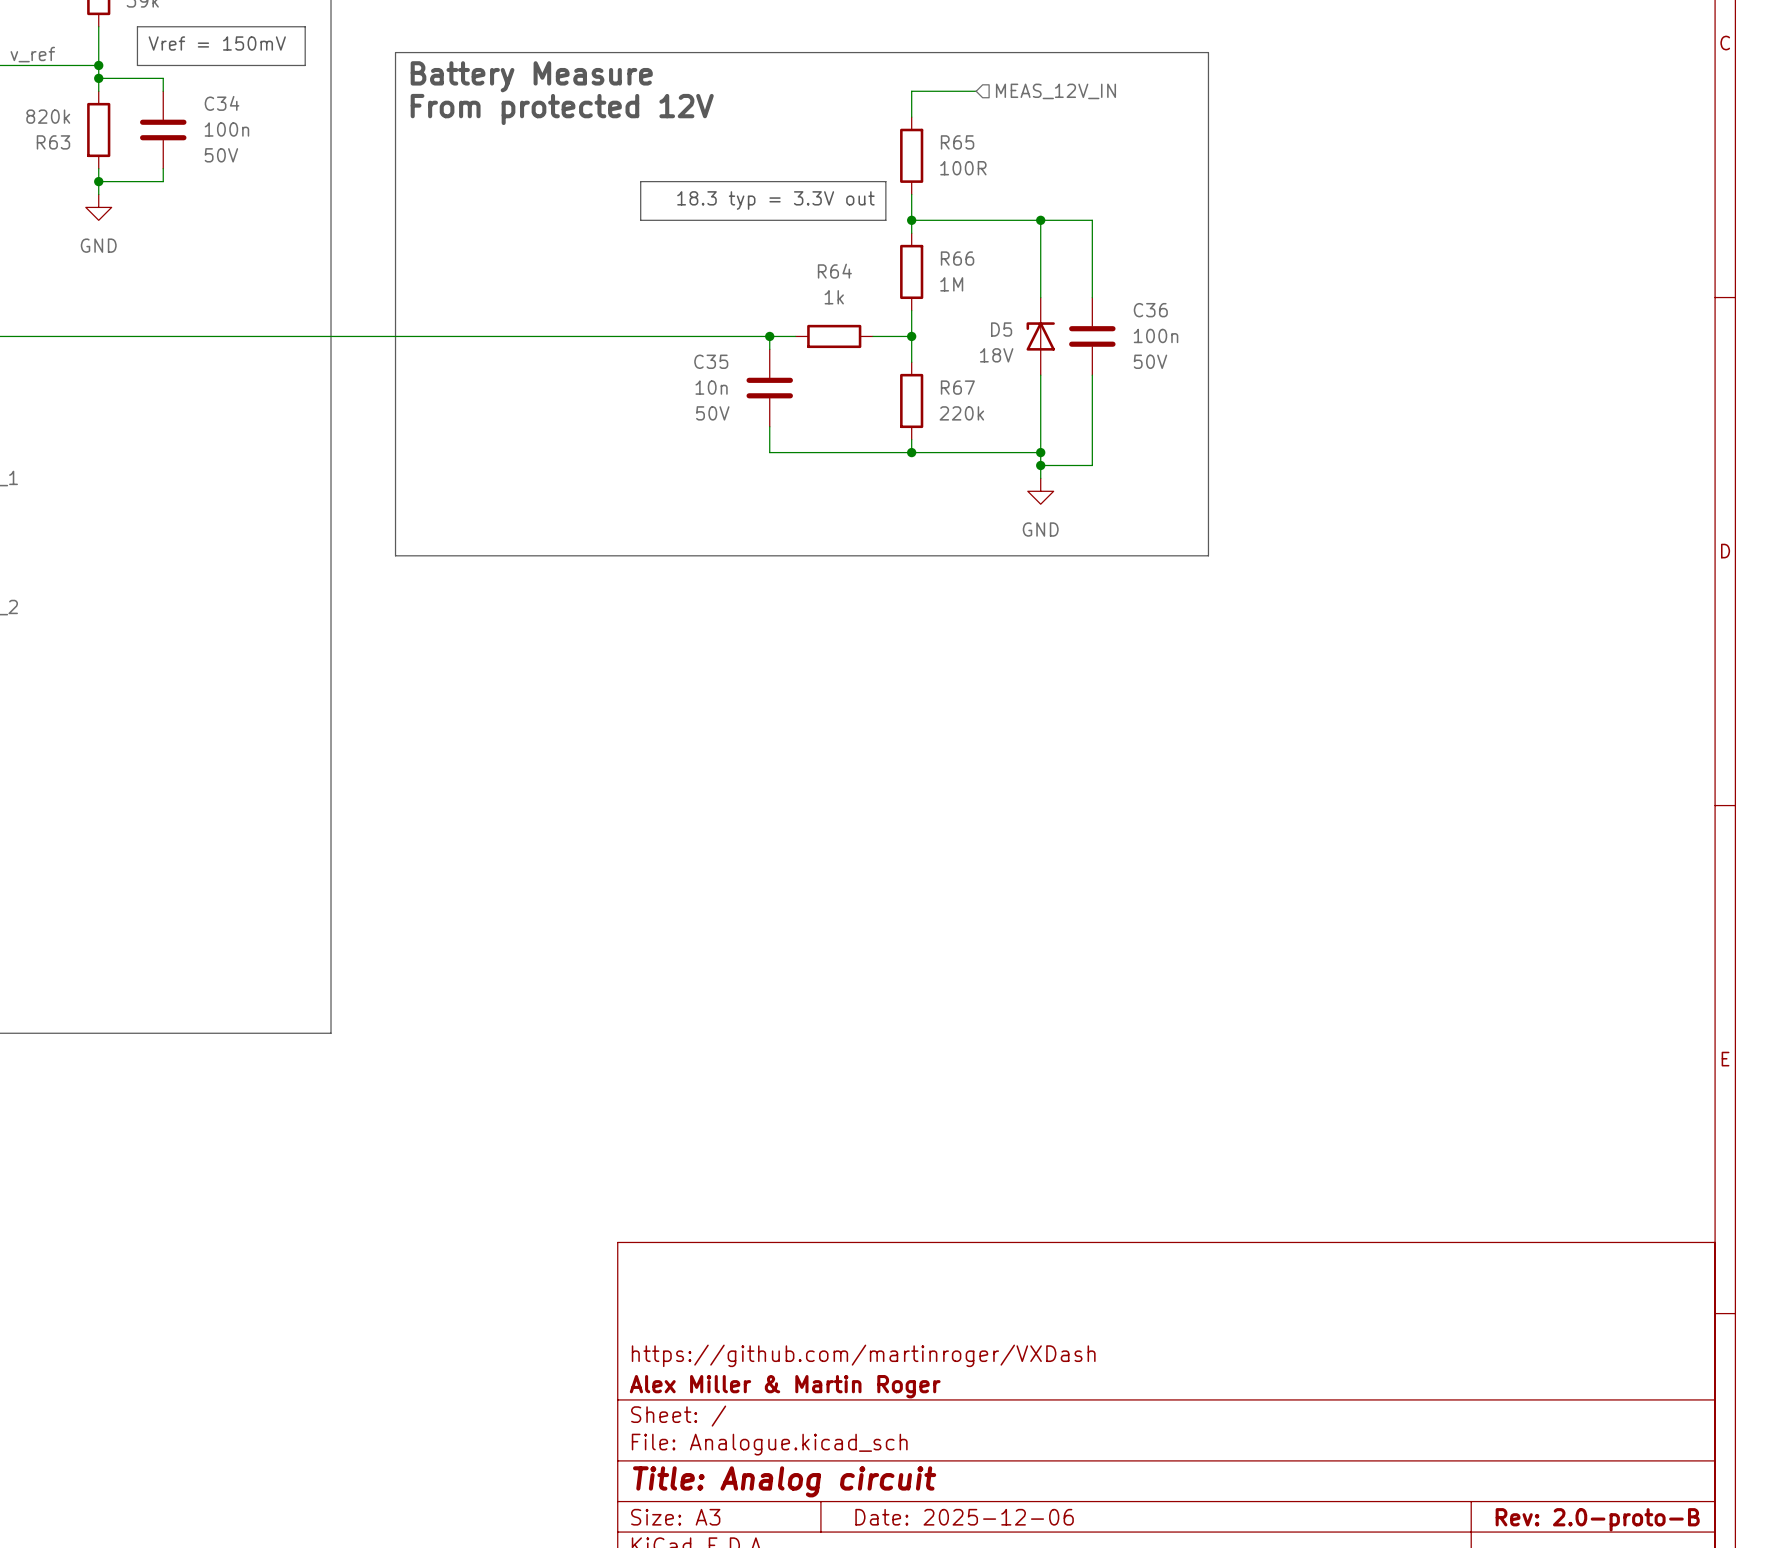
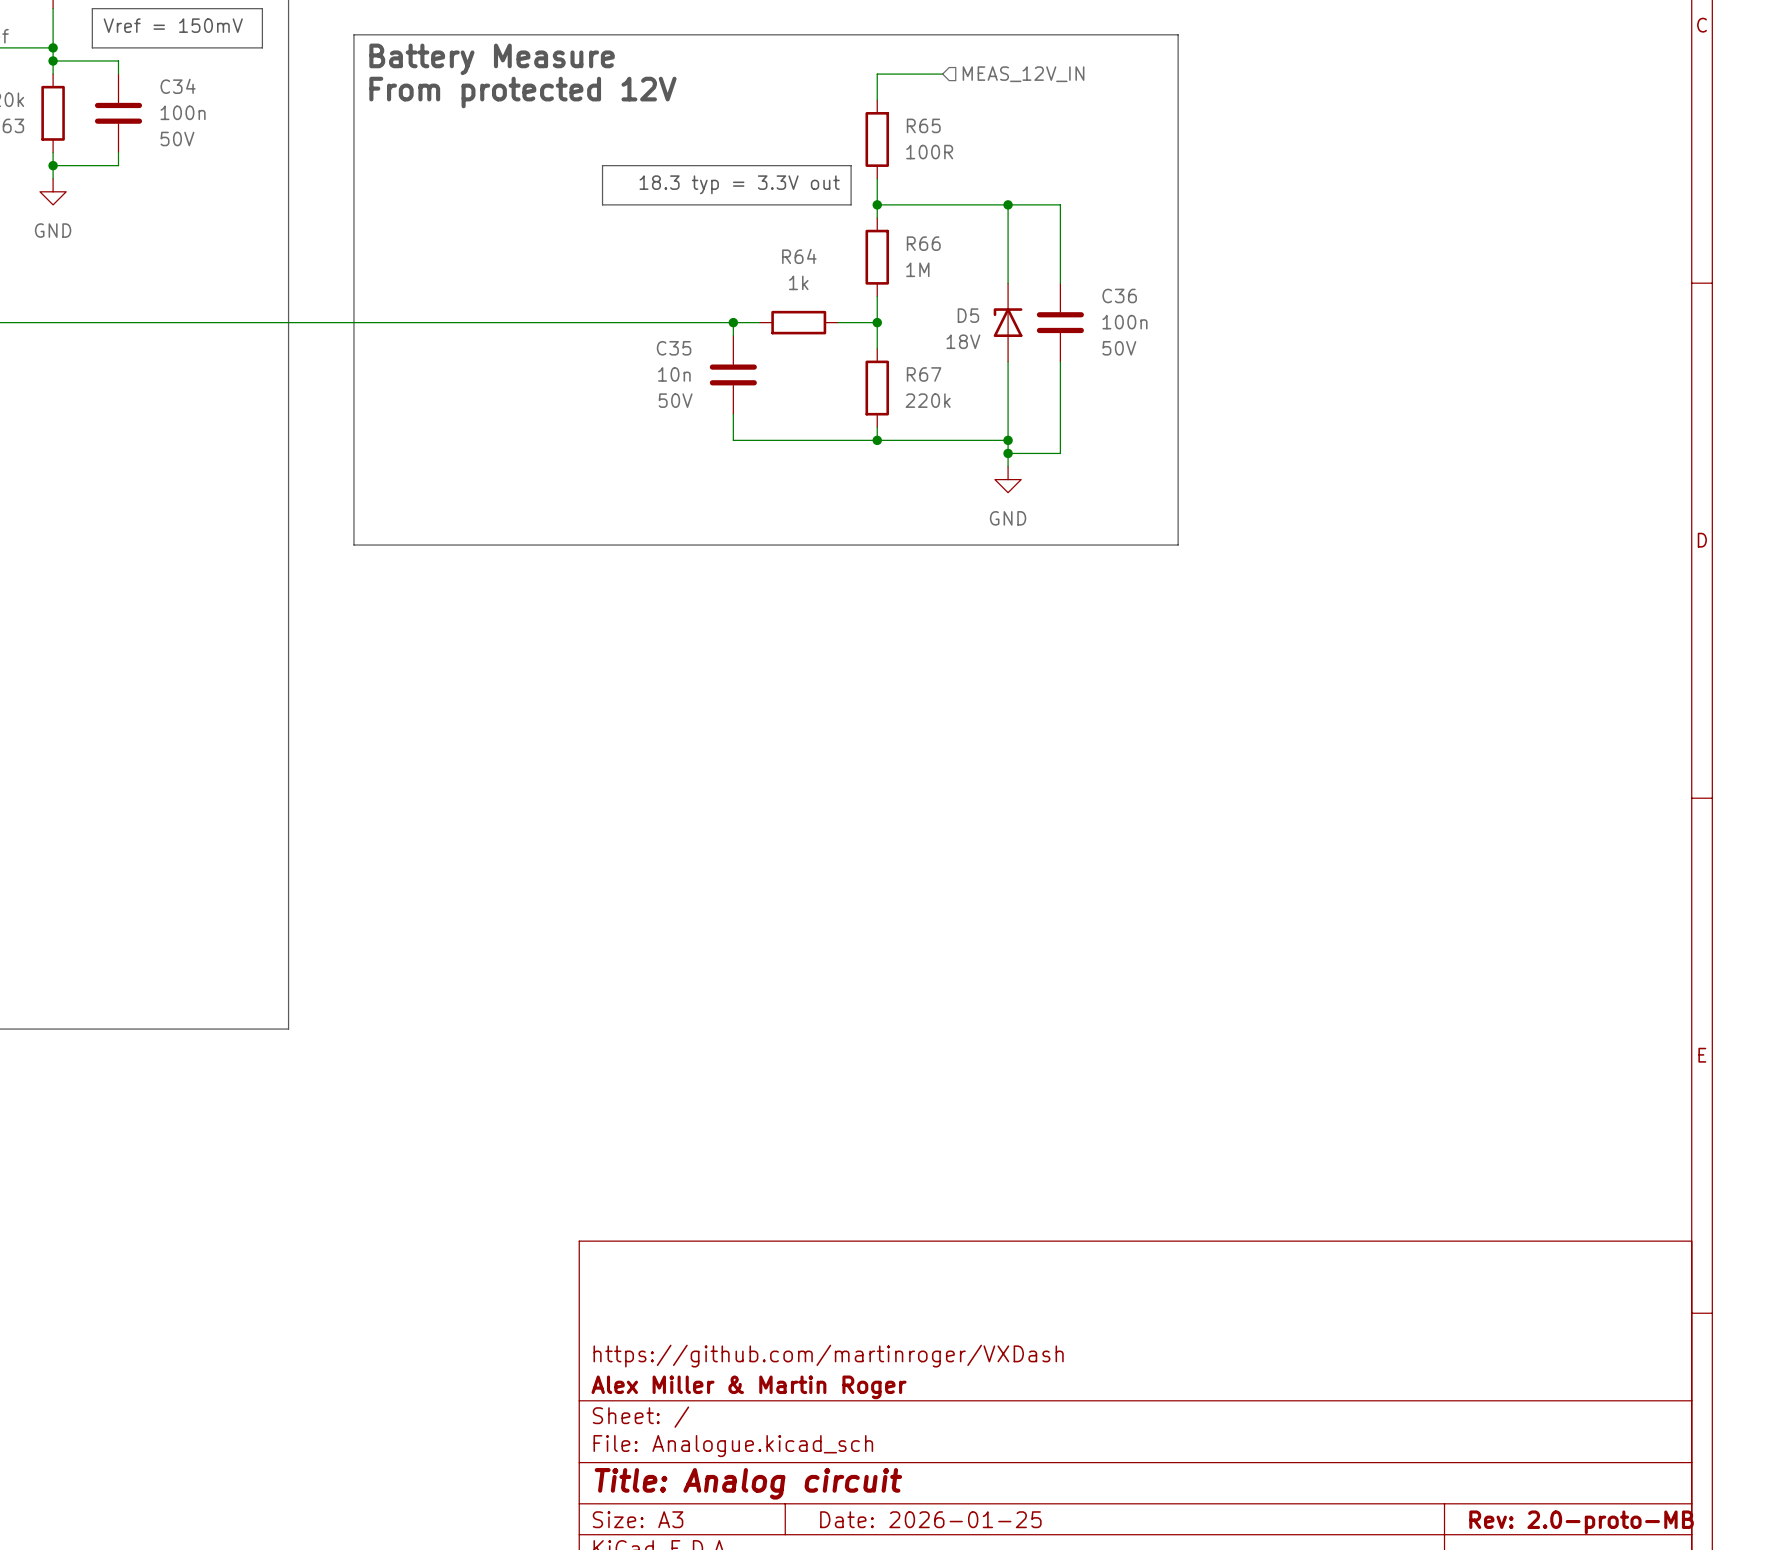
title block: Date: 2025-12-06 (964, 1517) -> Date: 2026-01-25 (930, 1519)
title block: Rev: 2.0-proto-B (1597, 1519) -> Rev: 2.0-proto-MB (1581, 1522)

